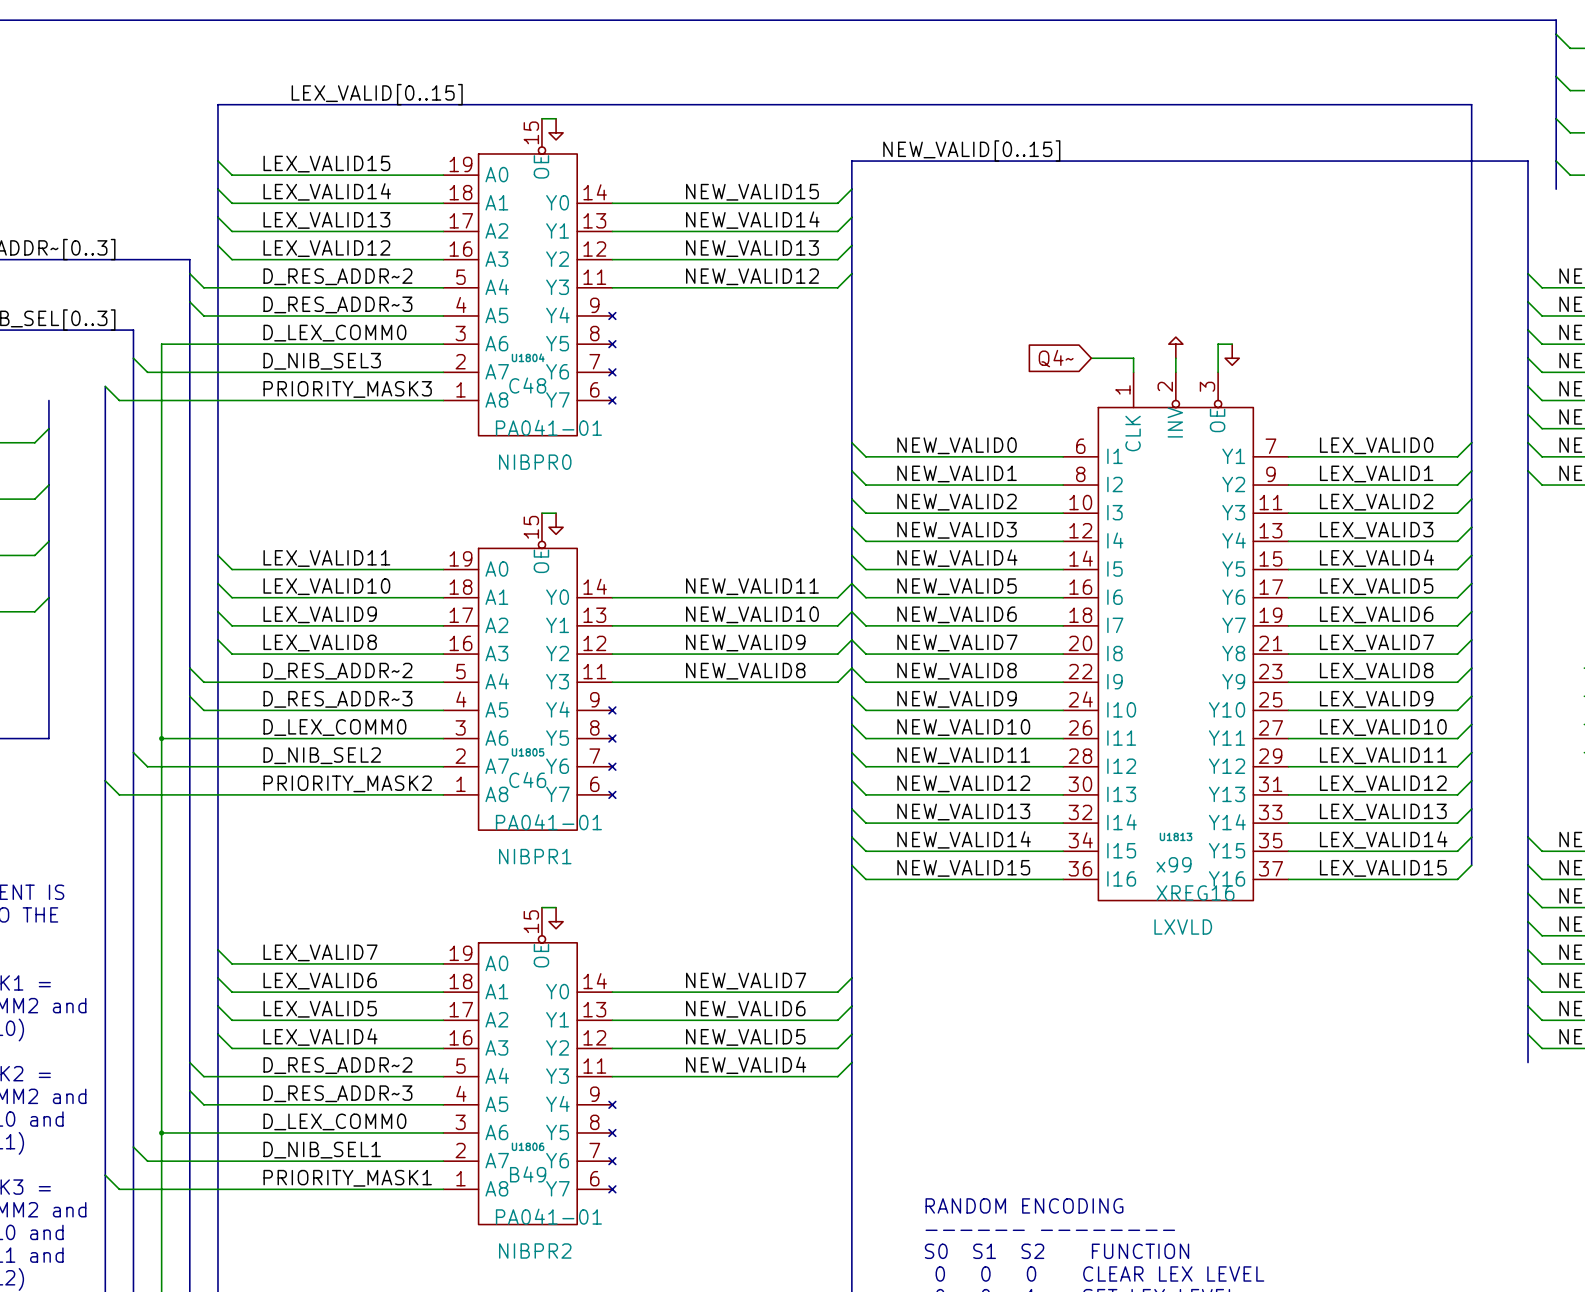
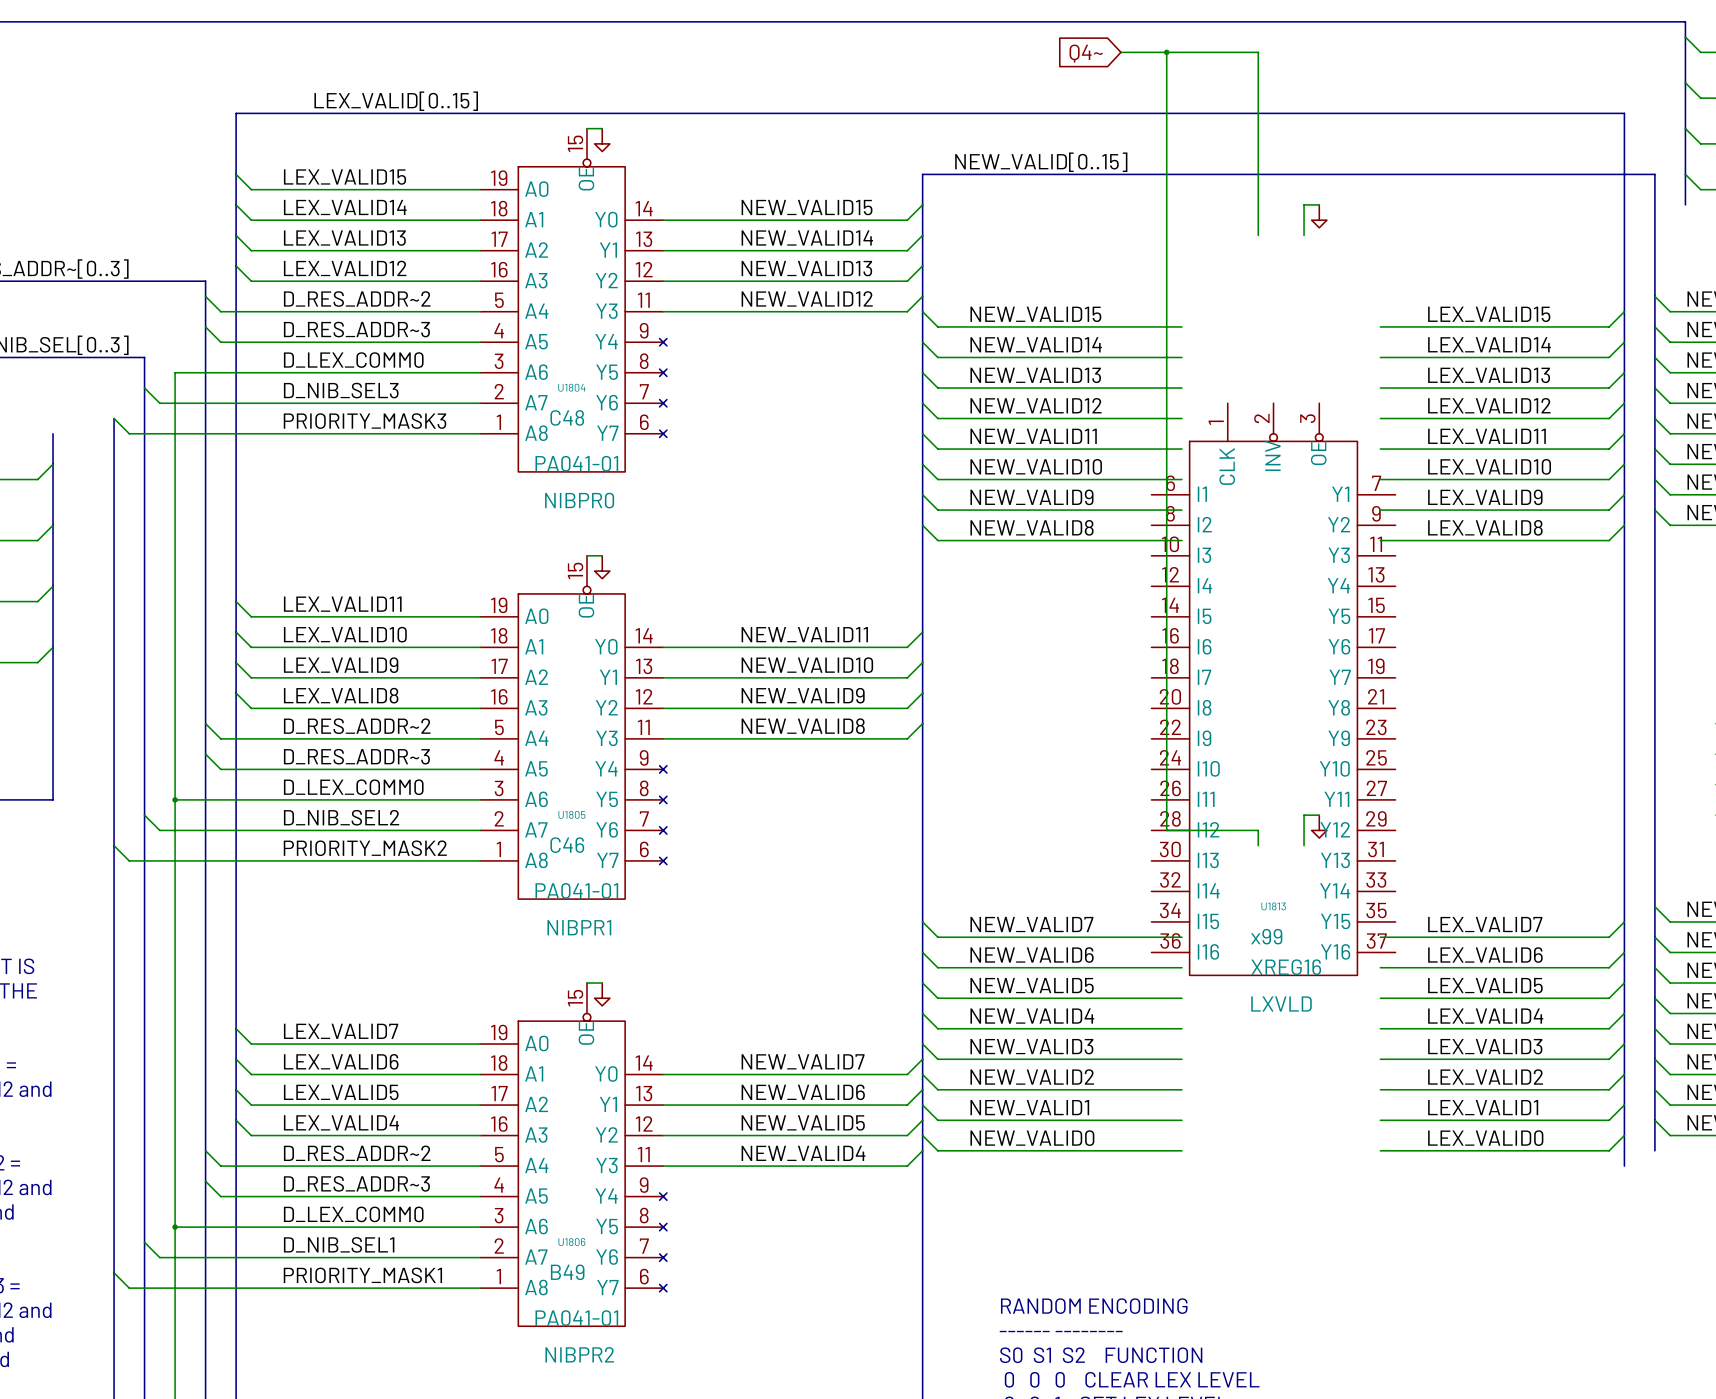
global label: none -> Q4~ (1086, 53)
wire: none -> (1120, 52) (1258, 52) (1258, 235)
wire: none -> (1166, 52) (1166, 830) (1258, 830) (1258, 845)
junction: none -> (1166, 52)
bus: (1471, 104) (1471, 865) -> (1593, 113) (1624, 113) (1624, 1166)
wire: none -> (1319, 204) (1304, 204) (1304, 235)
power symbol: none -> (1319, 216)
wire: none -> (922, 311) (937, 326) (1181, 326)
wire: none -> (1624, 311) (1609, 326) (1380, 326)
label: none -> NEW_VALID15 (1035, 314)
label: none -> LEX_VALID15 (1489, 314)
wire: none -> (922, 342) (937, 357) (1181, 357)
wire: none -> (1624, 342) (1609, 357) (1380, 357)
label: none -> NEW_VALID14 (1036, 344)
label: none -> LEX_VALID14 (1489, 344)
wire: (1232, 344) (1218, 344) (1218, 372) -> none
wire: none -> (1624, 372) (1609, 388) (1380, 388)
label: none -> NEW_VALID13 (1035, 375)
power symbol: (1175, 347) -> none
label: none -> LEX_VALID13 (1489, 375)
power symbol: (1232, 354) -> none
global label: Q4~ (1056, 358) -> none
wire: (1091, 358) (1133, 358) (1133, 372) -> (1181, 388) (937, 388) (922, 372)
wire: (1175, 358) (1175, 372) -> none
wire: none -> (922, 403) (937, 418) (1181, 418)
wire: none -> (1624, 403) (1609, 418) (1380, 418)
label: none -> NEW_VALID12 (1036, 405)
label: none -> LEX_VALID12 (1489, 405)
wire: none -> (922, 433) (937, 449) (1181, 449)
wire: none -> (1624, 433) (1609, 449) (1380, 449)
label: none -> NEW_VALID11 (1033, 436)
label: none -> LEX_VALID11 (1486, 436)
wire: none -> (922, 464) (937, 479) (1181, 479)
wire: none -> (1624, 464) (1609, 479) (1380, 479)
label: none -> NEW_VALID10 (1036, 466)
label: none -> LEX_VALID10 (1489, 466)
wire: (851, 442) (865, 456) (1063, 456) -> none
wire: (1471, 442) (1457, 456) (1288, 456) -> none
label: NEW_VALID0 (957, 445) -> none
label: LEX_VALID0 (1376, 445) -> none
wire: none -> (922, 494) (937, 510) (1181, 510)
wire: none -> (1624, 494) (1609, 510) (1380, 510)
label: none -> NEW_VALID9 (1031, 497)
label: none -> LEX_VALID9 (1485, 497)
wire: (851, 470) (865, 485) (1063, 485) -> none
wire: (1471, 470) (1457, 485) (1288, 485) -> none
label: NEW_VALID1 (957, 473) -> none
label: LEX_VALID1 (1376, 473) -> none
wire: none -> (922, 525) (937, 540) (1181, 540)
wire: none -> (1624, 525) (1609, 540) (1380, 540)
label: none -> NEW_VALID8 (1032, 527)
label: none -> LEX_VALID8 (1485, 527)
wire: (851, 499) (865, 513) (1063, 513) -> none
wire: (1471, 499) (1457, 513) (1288, 513) -> none
label: NEW_VALID2 (957, 502) -> none
label: LEX_VALID2 (1376, 502) -> none
wire: (851, 527) (865, 541) (1063, 541) -> none
wire: (1471, 527) (1457, 541) (1288, 541) -> none
label: NEW_VALID3 (957, 530) -> none
label: LEX_VALID3 (1376, 530) -> none
wire: (851, 555) (865, 569) (1063, 569) -> none
wire: (1471, 555) (1457, 569) (1288, 569) -> none
label: NEW_VALID4 (957, 558) -> none
label: LEX_VALID4 (1376, 558) -> none
wire: (851, 583) (865, 597) (1063, 597) -> none
wire: (1471, 583) (1457, 597) (1288, 597) -> none
label: NEW_VALID5 (957, 586) -> none
label: LEX_VALID5 (1376, 586) -> none
wire: (851, 611) (865, 625) (1063, 625) -> none
wire: (1471, 611) (1457, 625) (1288, 625) -> none
label: NEW_VALID6 (957, 614) -> none
label: LEX_VALID6 (1376, 614) -> none
wire: (851, 639) (865, 654) (1063, 654) -> none
wire: (1471, 639) (1457, 654) (1288, 654) -> none
label: NEW_VALID7 (957, 643) -> none
label: LEX_VALID7 (1376, 643) -> none
wire: (851, 668) (865, 682) (1063, 682) -> none
wire: (1471, 668) (1457, 682) (1288, 682) -> none
label: NEW_VALID8 (957, 671) -> none
label: LEX_VALID8 (1376, 671) -> none
wire: (851, 696) (865, 710) (1063, 710) -> none
wire: (1471, 696) (1457, 710) (1288, 710) -> none
label: NEW_VALID9 (957, 699) -> none
label: LEX_VALID9 (1376, 699) -> none
wire: (851, 724) (865, 738) (1063, 738) -> none
wire: (1471, 724) (1457, 738) (1288, 738) -> none
label: NEW_VALID10 (963, 727) -> none
label: LEX_VALID10 (1383, 727) -> none
wire: (851, 752) (865, 766) (1063, 766) -> none
wire: none -> (1319, 815) (1304, 815) (1304, 845)
wire: (1471, 752) (1457, 766) (1288, 766) -> none
label: NEW_VALID11 (963, 755) -> none
label: LEX_VALID11 (1383, 755) -> none
power symbol: none -> (1319, 826)
wire: (851, 780) (865, 794) (1063, 794) -> none
wire: (1471, 780) (1457, 794) (1288, 794) -> none
label: NEW_VALID12 (963, 783) -> none
label: LEX_VALID12 (1383, 783) -> none
wire: (851, 809) (865, 823) (1063, 823) -> none
wire: (1471, 809) (1457, 823) (1288, 823) -> none
label: NEW_VALID13 (963, 812) -> none
label: LEX_VALID13 (1383, 812) -> none
wire: (851, 837) (865, 851) (1063, 851) -> none
wire: (1471, 837) (1457, 851) (1288, 851) -> none
label: NEW_VALID14 (964, 839) -> none
label: LEX_VALID14 (1383, 839) -> none
wire: none -> (922, 921) (937, 937) (1181, 937)
wire: none -> (1624, 921) (1609, 937) (1380, 937)
label: none -> NEW_VALID7 (1031, 924)
label: none -> LEX_VALID7 (1485, 924)
wire: (851, 865) (865, 879) (1063, 879) -> none
wire: (1471, 865) (1457, 879) (1288, 879) -> none
label: NEW_VALID15 (963, 868) -> none
label: LEX_VALID15 (1383, 868) -> none
wire: none -> (922, 952) (937, 967) (1181, 967)
wire: none -> (1624, 952) (1609, 967) (1380, 967)
label: none -> NEW_VALID6 (1032, 955)
label: none -> LEX_VALID6 (1485, 955)
wire: none -> (922, 982) (937, 998) (1181, 998)
wire: none -> (1624, 982) (1609, 998) (1380, 998)
label: none -> NEW_VALID5 (1032, 985)
label: none -> LEX_VALID5 (1485, 985)
wire: none -> (922, 1013) (937, 1028) (1181, 1028)
wire: none -> (1624, 1013) (1609, 1028) (1380, 1028)
label: none -> NEW_VALID4 (1032, 1016)
label: none -> LEX_VALID4 (1485, 1016)
wire: none -> (922, 1044) (937, 1059) (1181, 1059)
wire: none -> (1624, 1044) (1609, 1059) (1380, 1059)
label: none -> NEW_VALID3 (1031, 1046)
label: none -> LEX_VALID3 (1485, 1046)
wire: none -> (922, 1074) (937, 1089) (1181, 1089)
wire: none -> (1624, 1074) (1609, 1089) (1380, 1089)
label: none -> NEW_VALID2 (1032, 1077)
label: none -> LEX_VALID2 (1485, 1077)
wire: none -> (922, 1105) (937, 1120) (1181, 1120)
wire: none -> (1624, 1105) (1609, 1120) (1380, 1120)
label: none -> NEW_VALID1 (1029, 1107)
label: none -> LEX_VALID1 (1483, 1107)
wire: none -> (922, 1135) (937, 1150) (1181, 1150)
wire: none -> (1624, 1135) (1609, 1150) (1380, 1150)
label: none -> NEW_VALID0 (1032, 1138)
label: none -> LEX_VALID0 (1485, 1138)

